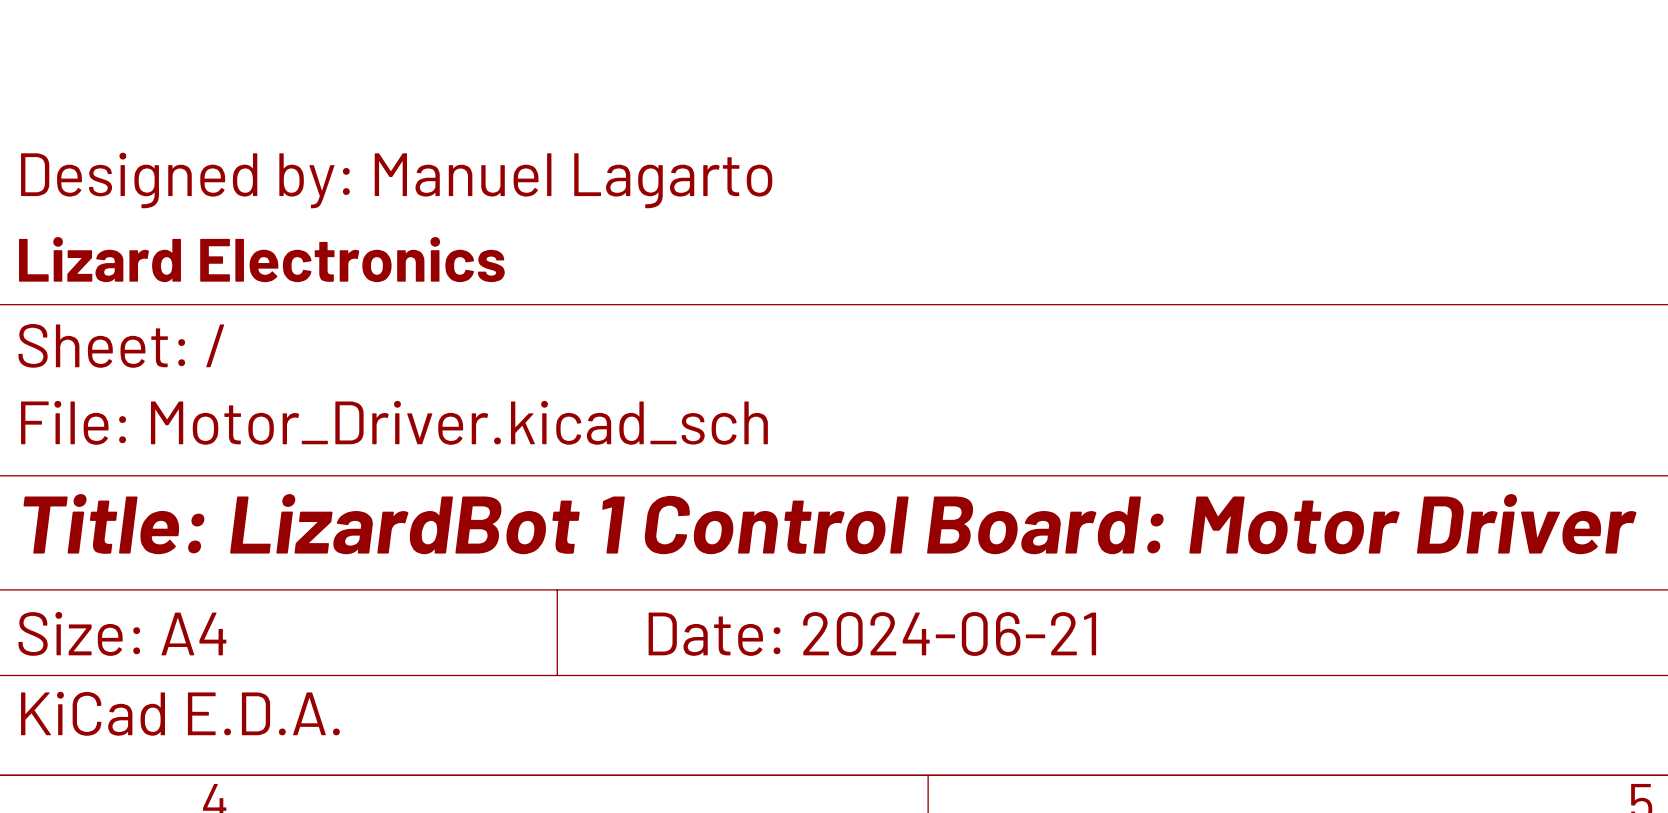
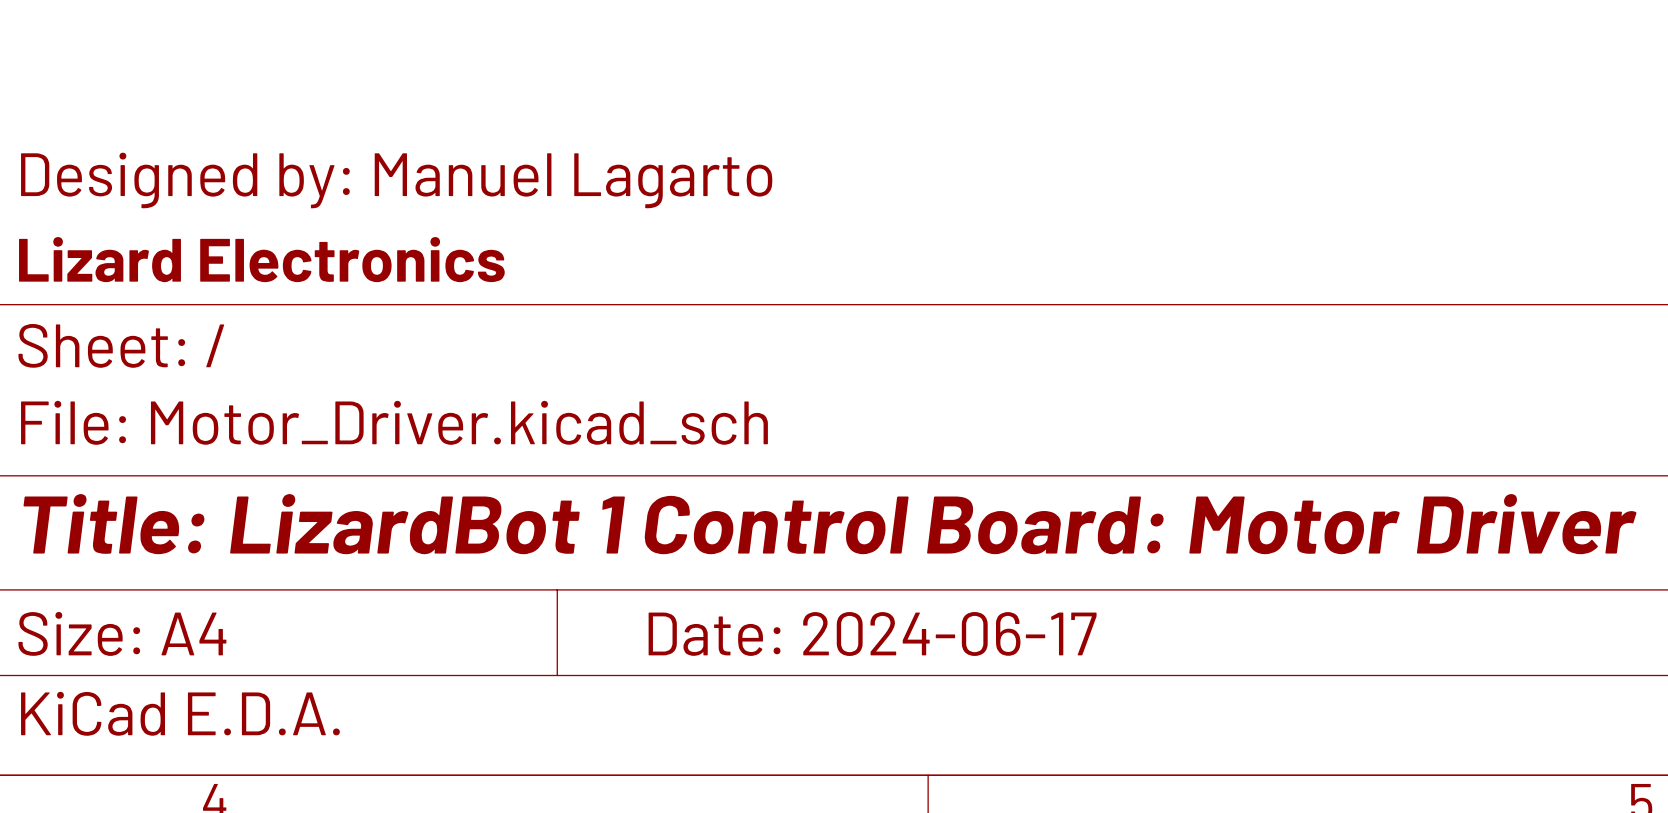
title block: Date: 2024-06-21 (872, 633) -> Date: 2024-06-17 (872, 633)

